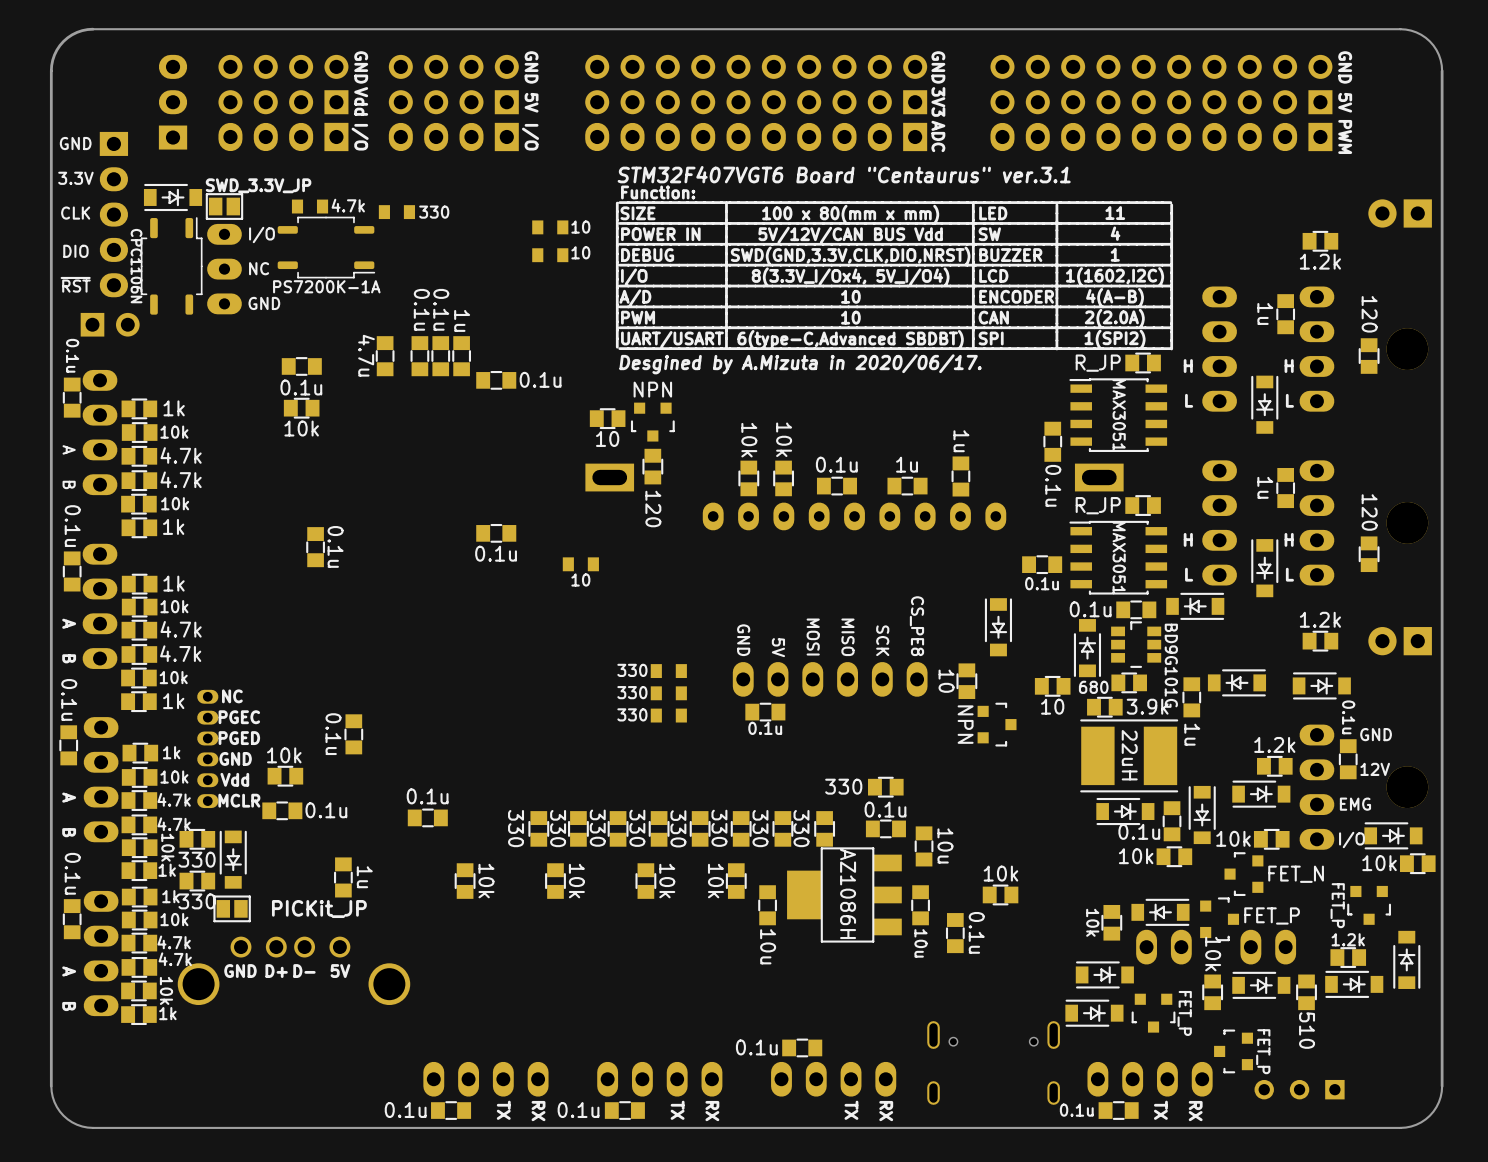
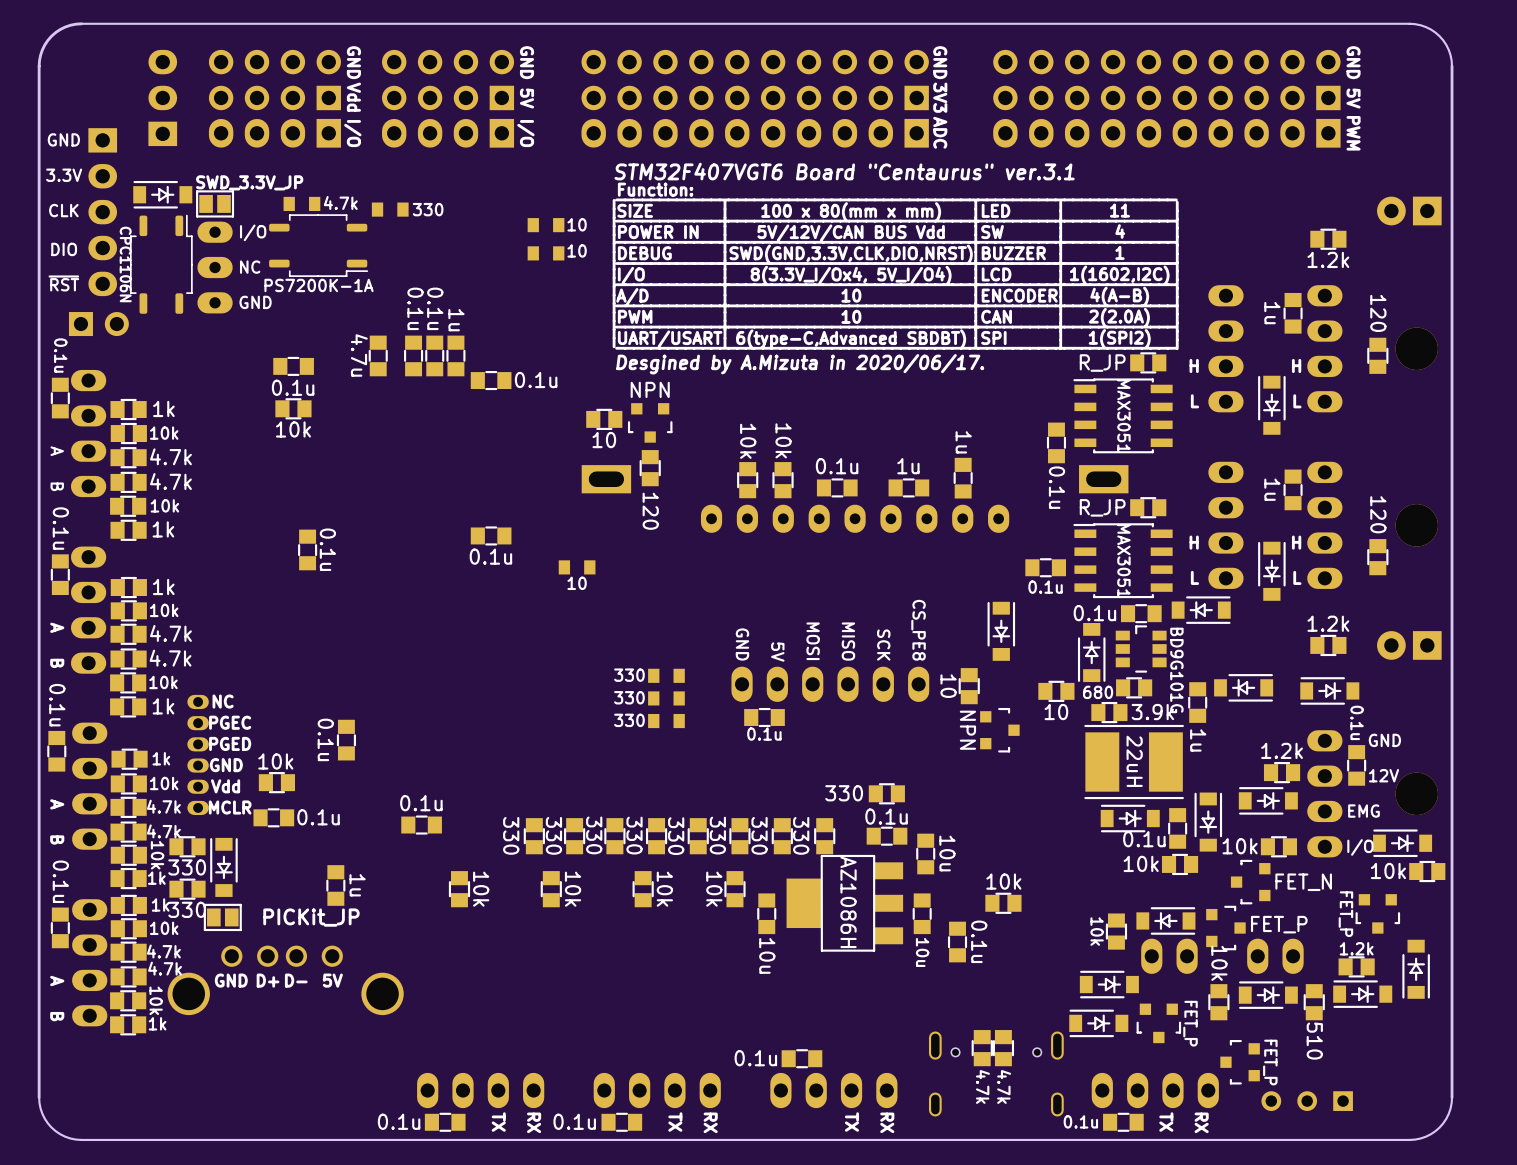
part: none -> 4.7k (982, 1048)
part: none -> 4.7k (1003, 1048)

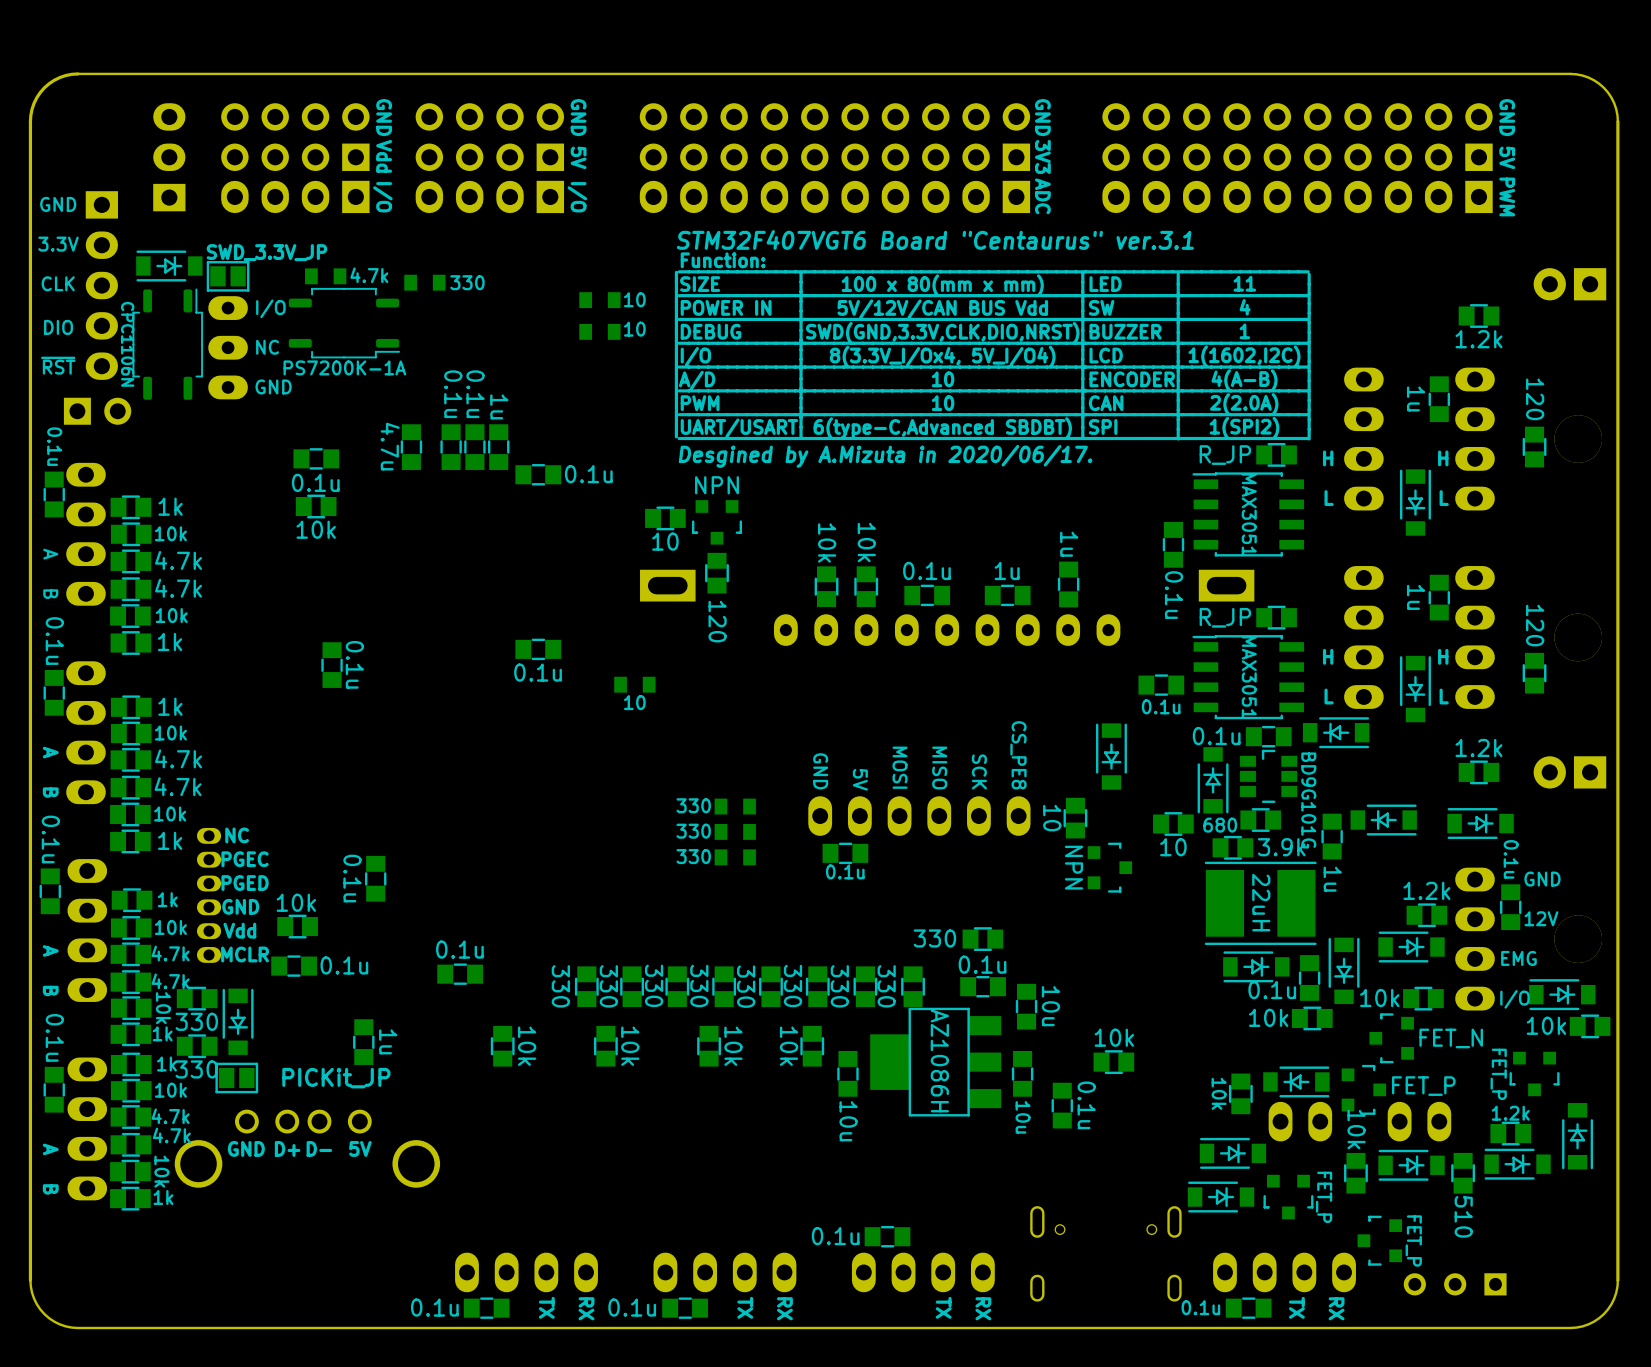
part: 4.7k (982, 1048) -> none
part: 4.7k (1003, 1048) -> none

